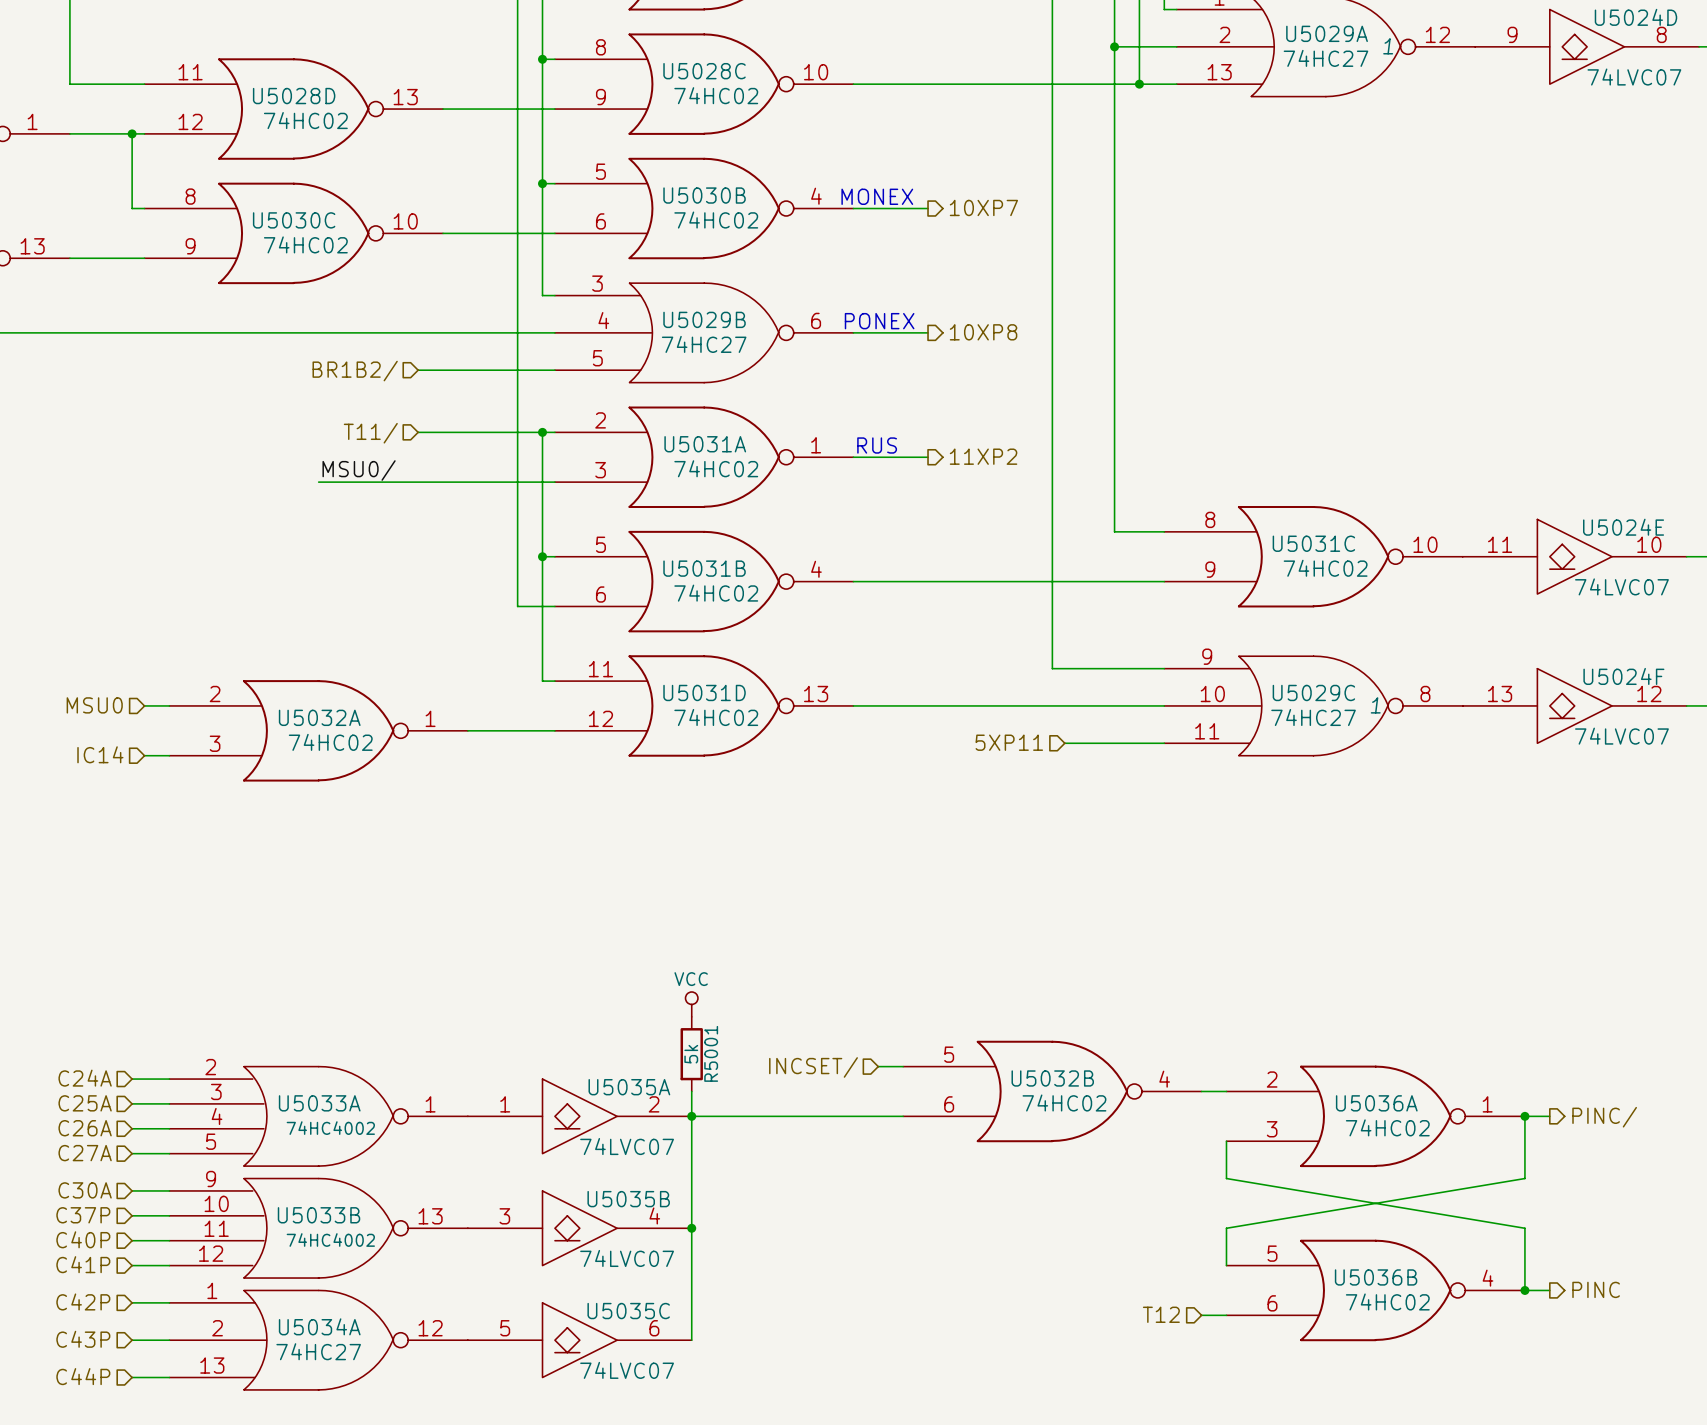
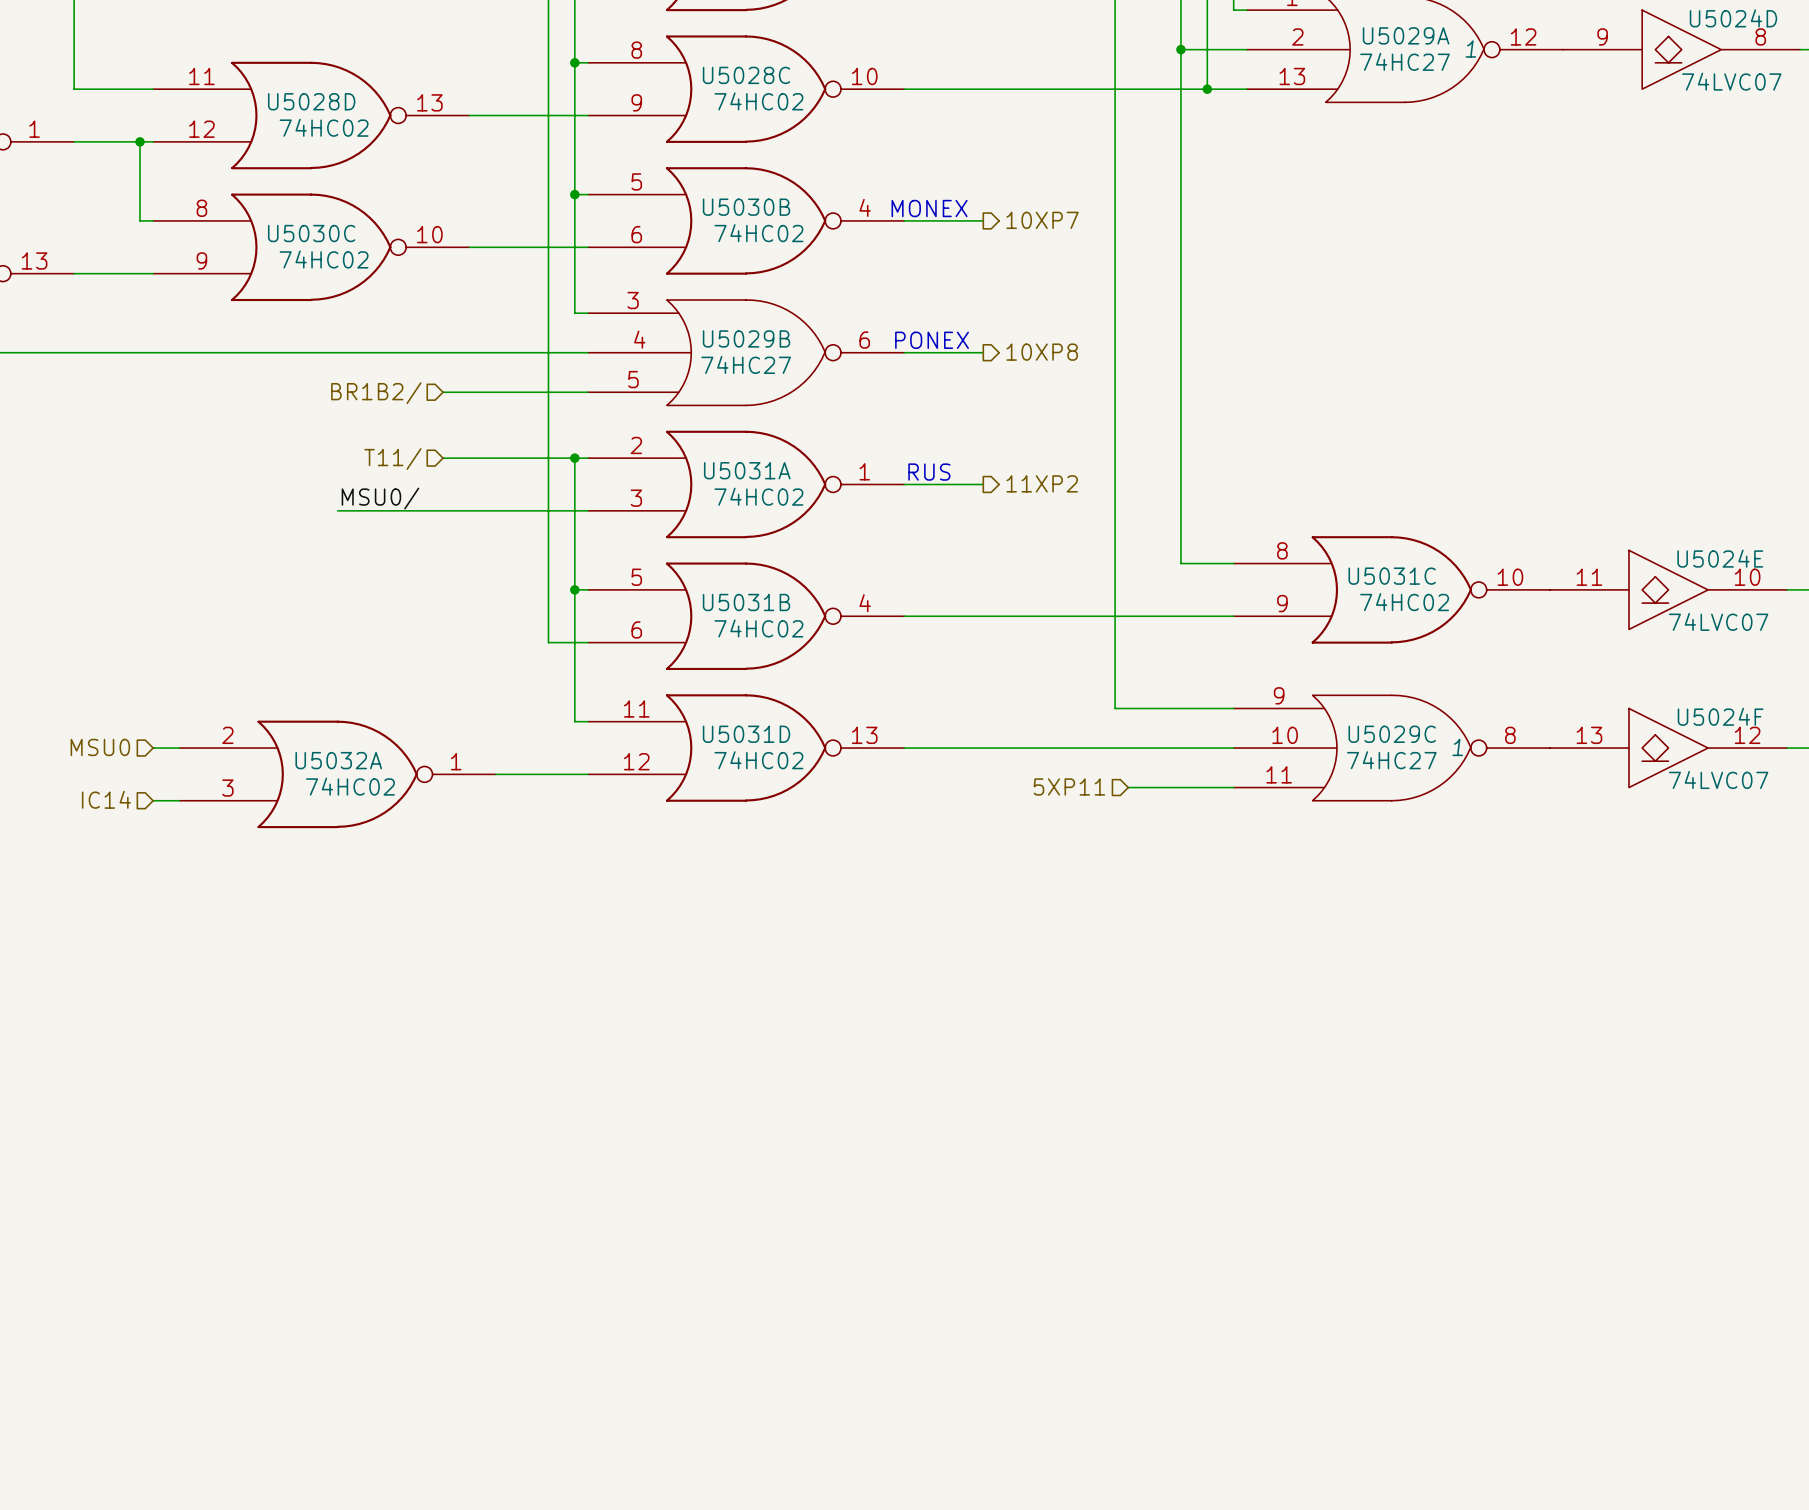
power symbol: VCC (691, 1004) -> none
R5001: 5k (691, 1054) -> none
wire: (878, 1066) (903, 1066) -> none
hierarchical label: INCSET/ (813, 1067) -> none
hierarchical label: C24A (85, 1078) -> none
wire: (132, 1079) (169, 1079) -> none
wire: (691, 1091) (691, 1340) -> none
U5032B: 74HC02 (1052, 1091) -> none
wire: (1201, 1091) (1226, 1091) -> none
hierarchical label: C25A (85, 1103) -> none
wire: (132, 1103) (169, 1103) -> none
U5033A: 74HC4002 (318, 1116) -> none
U5035A: 74LVC07 (579, 1116) -> none
wire: (691, 1116) (903, 1116) -> none
junction: (691, 1116) -> none
U5036A: 74HC02 (1375, 1116) -> none
junction: (1524, 1116) -> none
wire: (1549, 1116) (1524, 1116) (1524, 1178) (1226, 1228) (1226, 1265) -> none
hierarchical label: PINC/ (1604, 1117) -> none
hierarchical label: C26A (85, 1128) -> none
wire: (132, 1128) (169, 1128) -> none
wire: (1226, 1141) (1226, 1178) (1524, 1228) (1524, 1290) (1549, 1290) -> none
hierarchical label: C27A (85, 1153) -> none
wire: (132, 1153) (169, 1153) -> none
hierarchical label: C30A (85, 1190) -> none
wire: (132, 1190) (169, 1190) -> none
hierarchical label: C37P (83, 1215) -> none
wire: (132, 1215) (169, 1215) -> none
U5033B: 74HC4002 (318, 1228) -> none
U5035B: 74LVC07 (579, 1228) -> none
junction: (691, 1228) -> none
hierarchical label: C40P (83, 1239) -> none
wire: (132, 1240) (169, 1240) -> none
hierarchical label: C41P (83, 1264) -> none
wire: (132, 1265) (169, 1265) -> none
hierarchical label: PINC (1596, 1289) -> none
U5036B: 74HC02 (1375, 1290) -> none
junction: (1524, 1290) -> none
hierarchical label: C42P (83, 1301) -> none
wire: (132, 1302) (169, 1302) -> none
hierarchical label: T12 (1161, 1314) -> none
wire: (1201, 1315) (1226, 1315) -> none
hierarchical label: C43P (83, 1339) -> none
wire: (132, 1340) (169, 1340) -> none
U5034A: 74HC27 (318, 1340) -> none
U5035C: 74LVC07 (579, 1340) -> none
hierarchical label: C44P (83, 1376) -> none
wire: (132, 1377) (169, 1377) -> none

